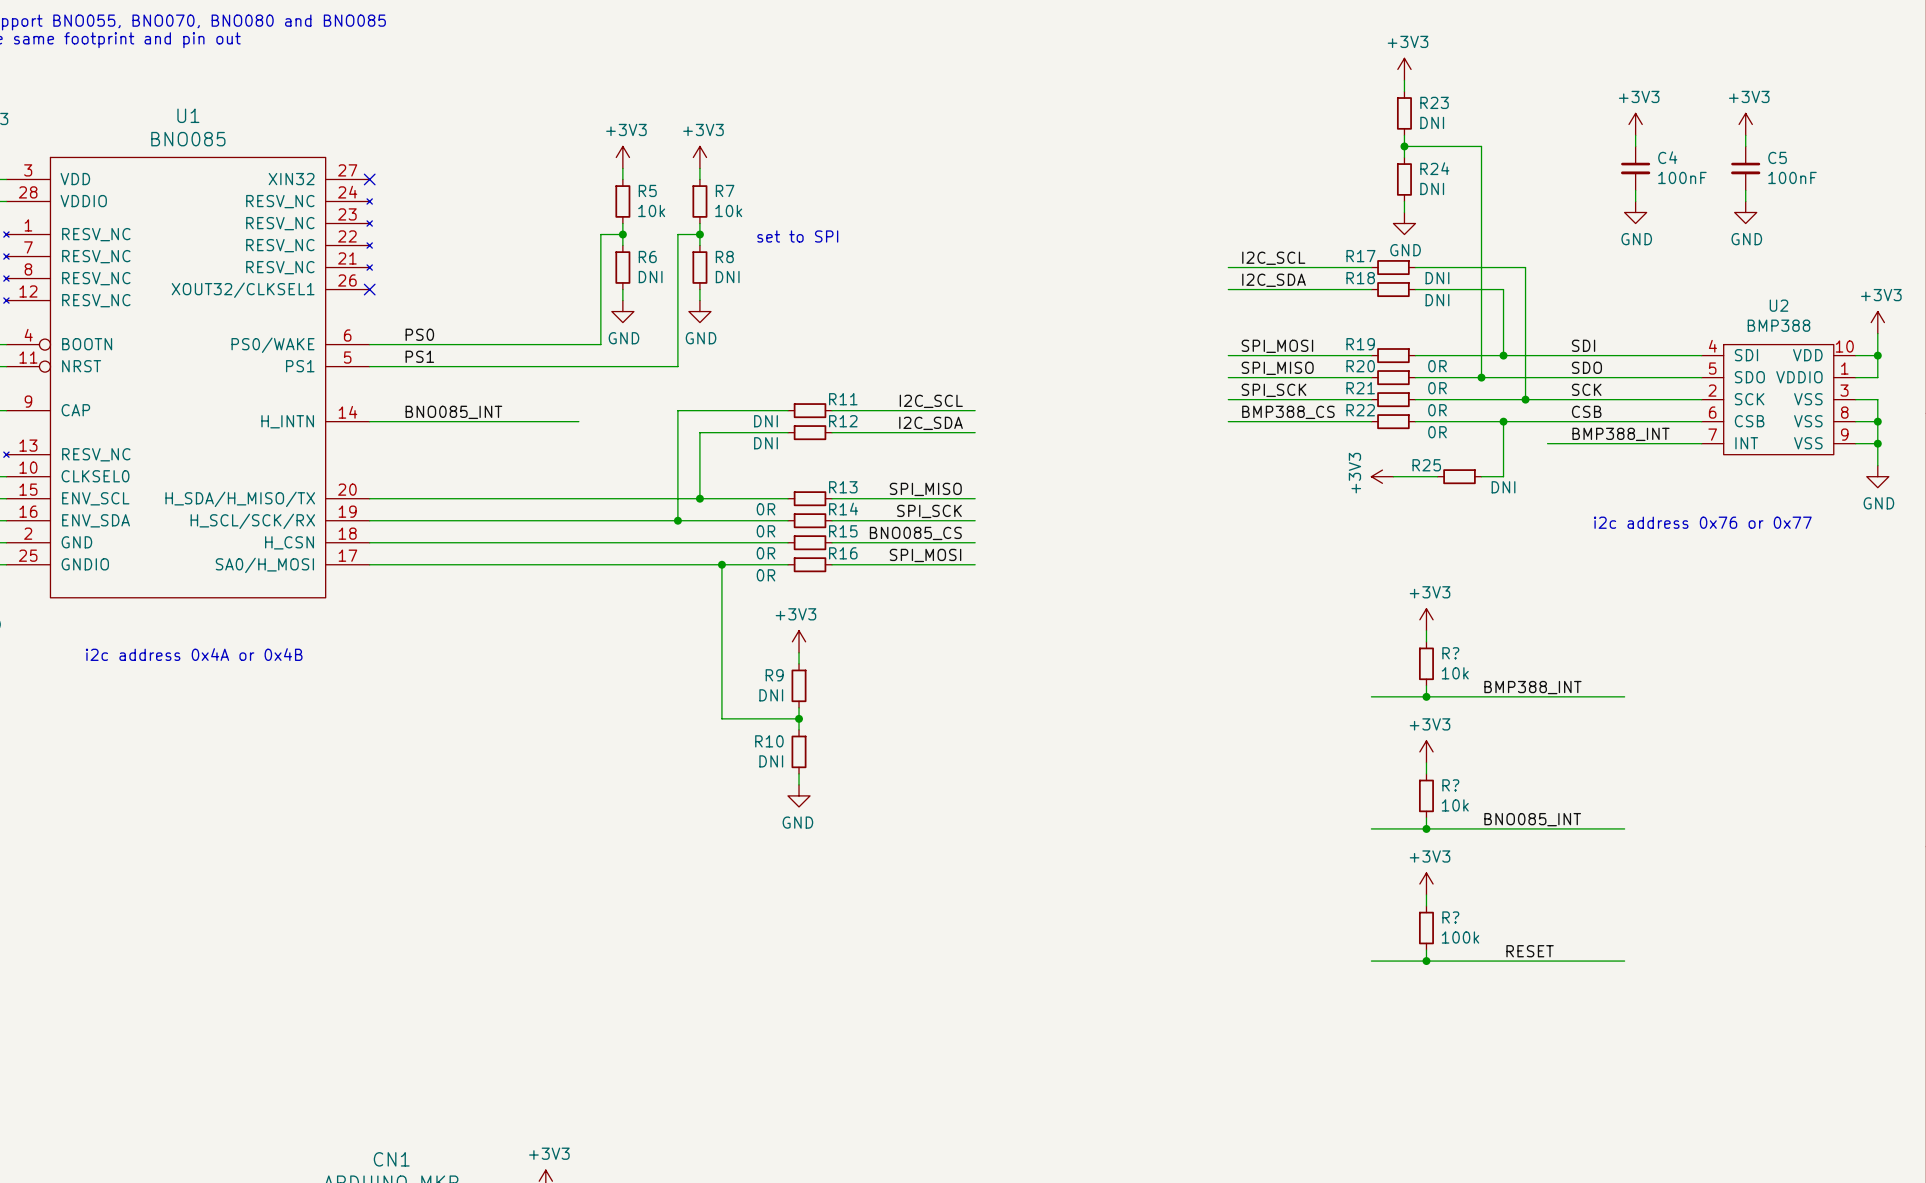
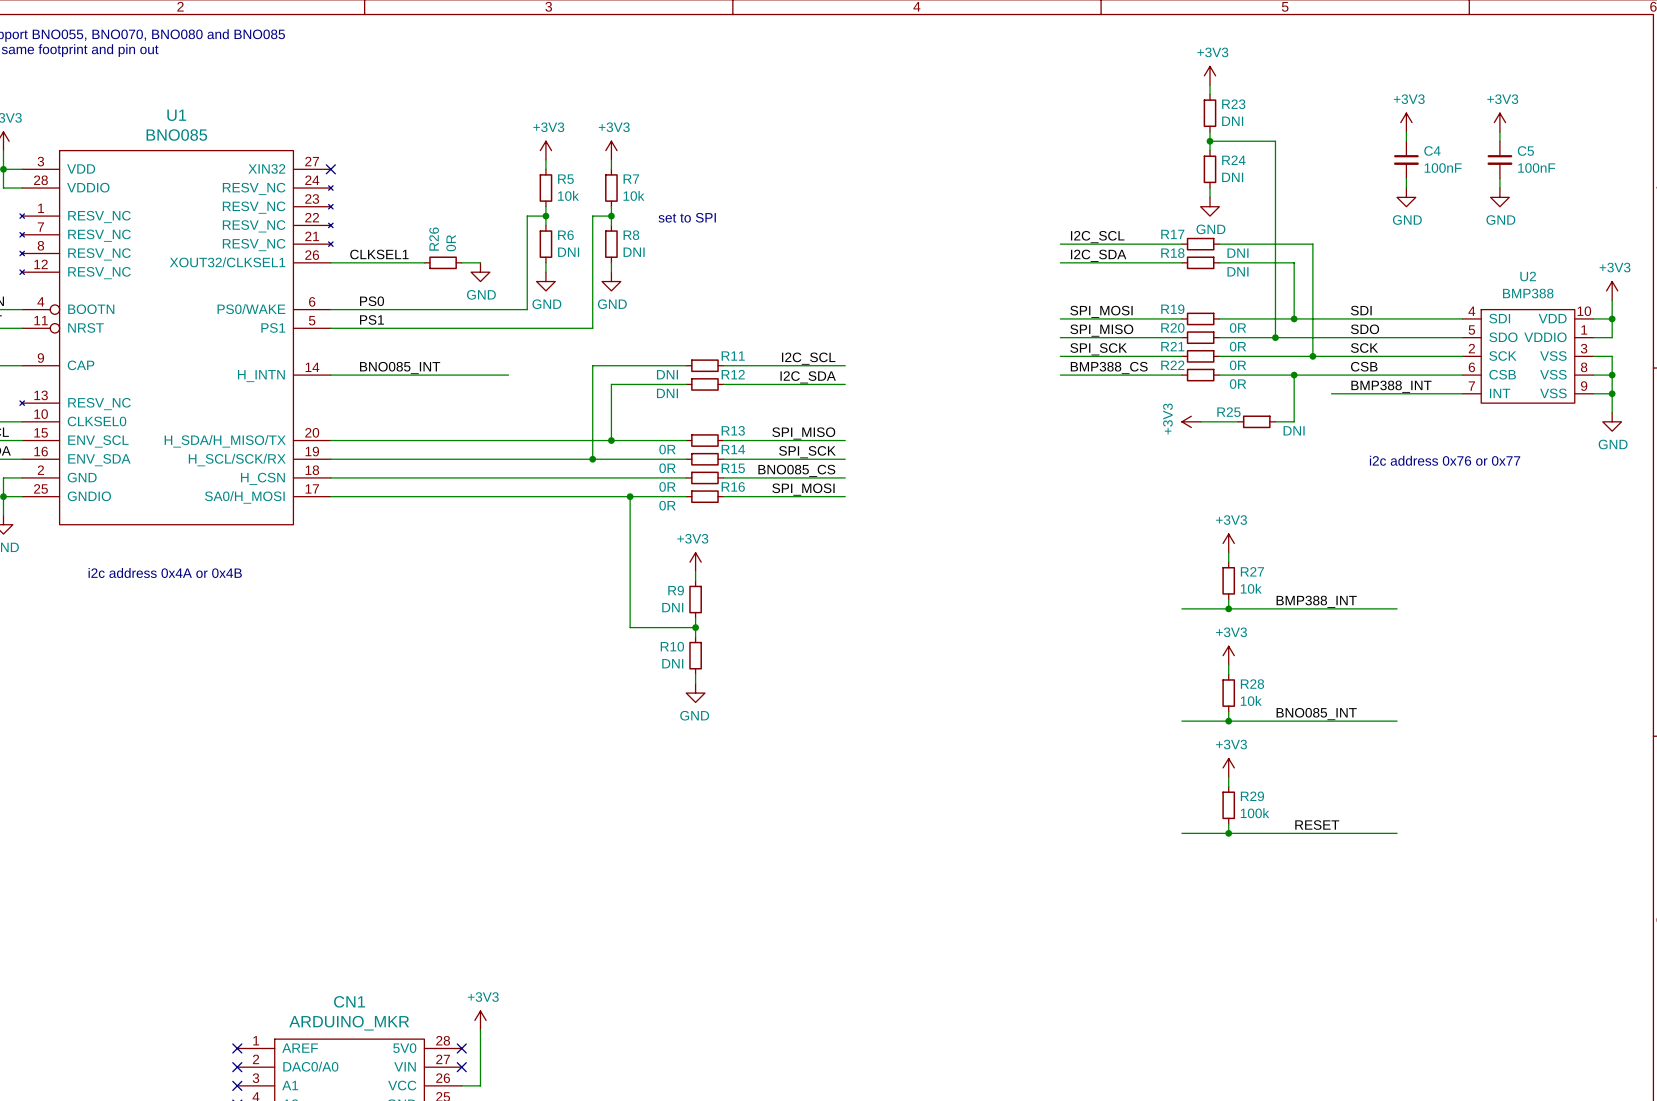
label: none -> CLKSEL1 (379, 254)
wire: none -> (330, 262) (424, 262)
no-connect mark: (369, 289) -> none
R26: none -> 0R (443, 262)
wire: none -> (461, 262) (480, 262)
power symbol: none -> GND (480, 272)
R? name: R? (1450, 653) -> R27 (1252, 571)
R? name: R? (1450, 785) -> R28 (1252, 684)
R? name: R? (1450, 917) -> R29 (1252, 796)

